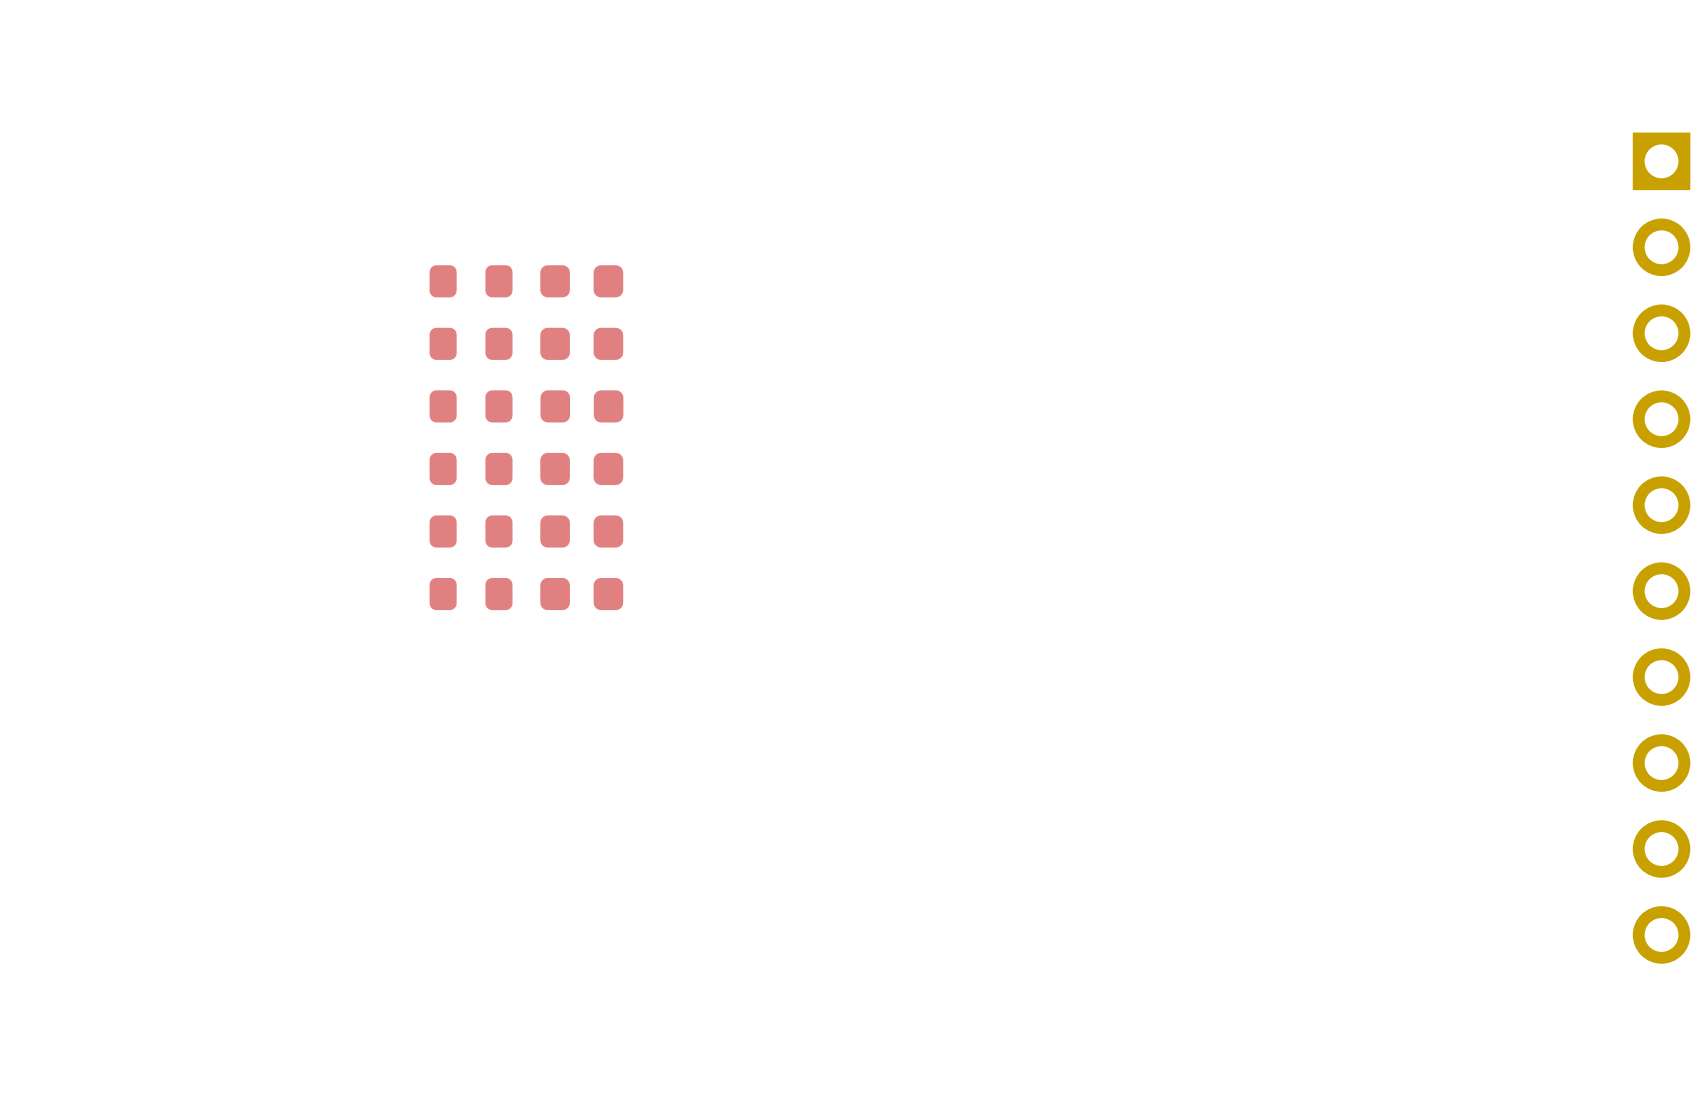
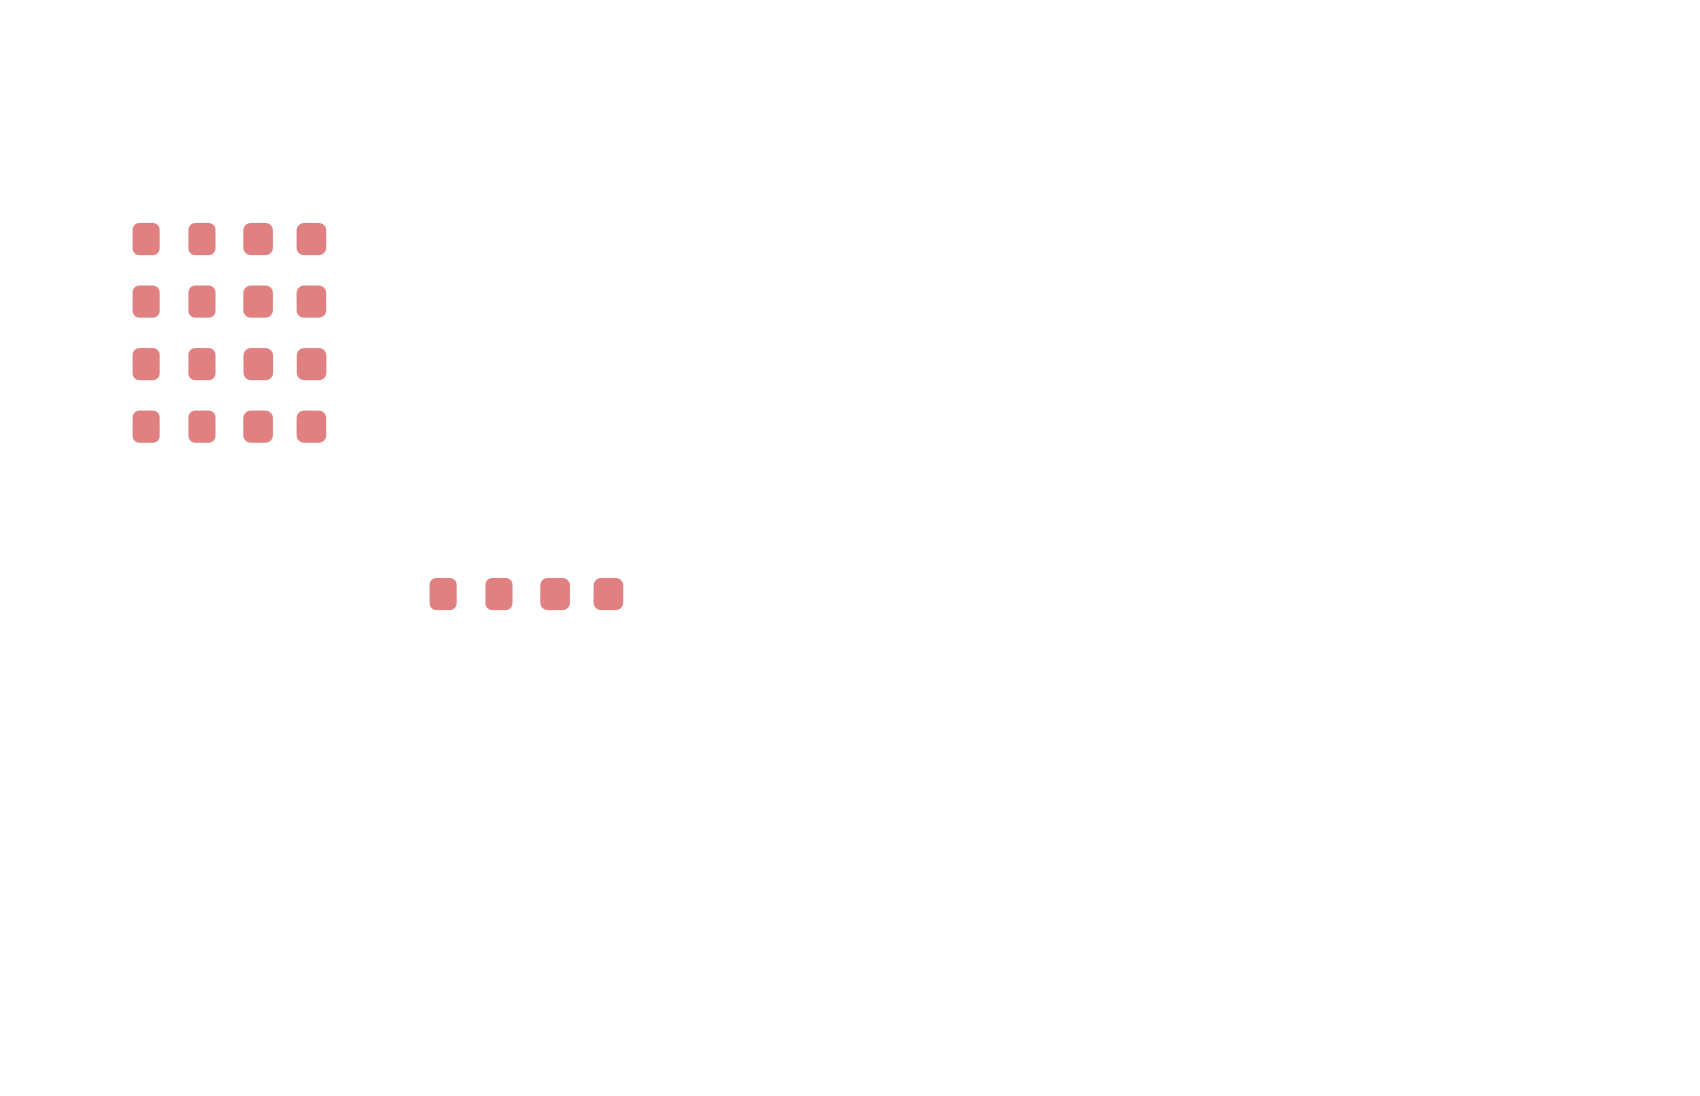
part: none -> (174, 239)
part: none -> (284, 239)
part: (471, 281) -> none
part: (581, 281) -> none
part: none -> (174, 301)
part: none -> (284, 301)
part: (471, 343) -> none
part: (581, 343) -> none
part: none -> (174, 364)
part: none -> (284, 364)
part: (471, 406) -> none
part: (581, 406) -> none
part: none -> (174, 426)
part: none -> (284, 426)
part: (471, 468) -> none
part: (581, 468) -> none
part: (471, 531) -> none
part: (581, 531) -> none
part: (1661, 548) -> none

